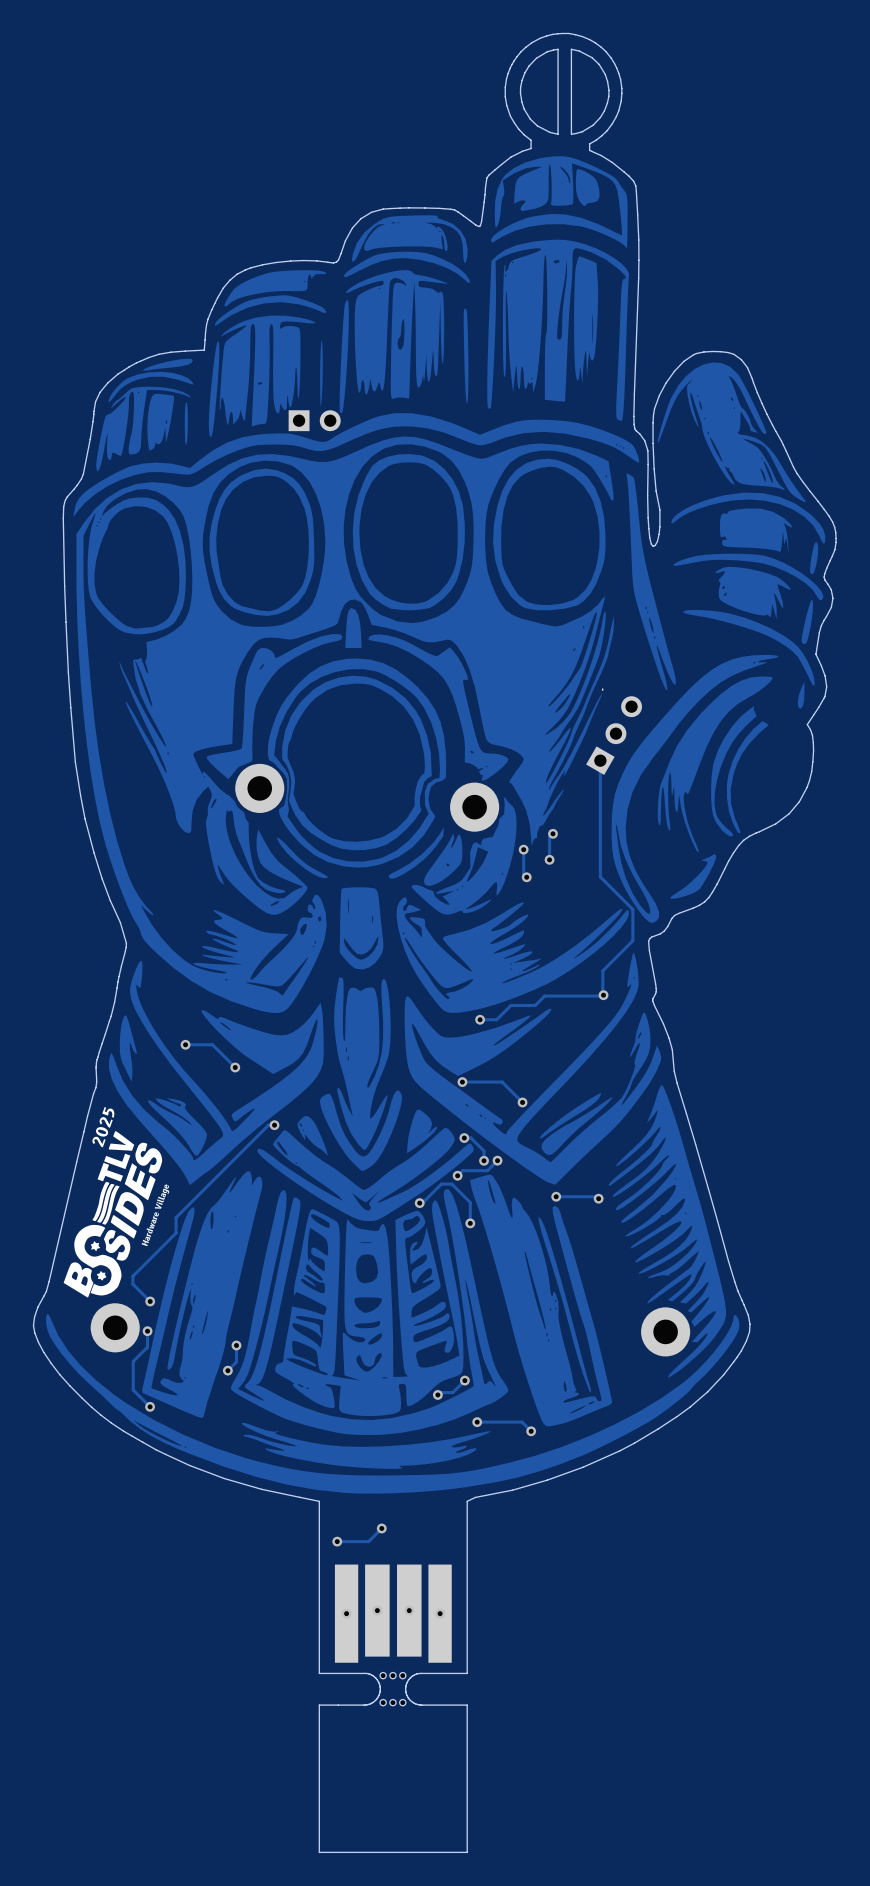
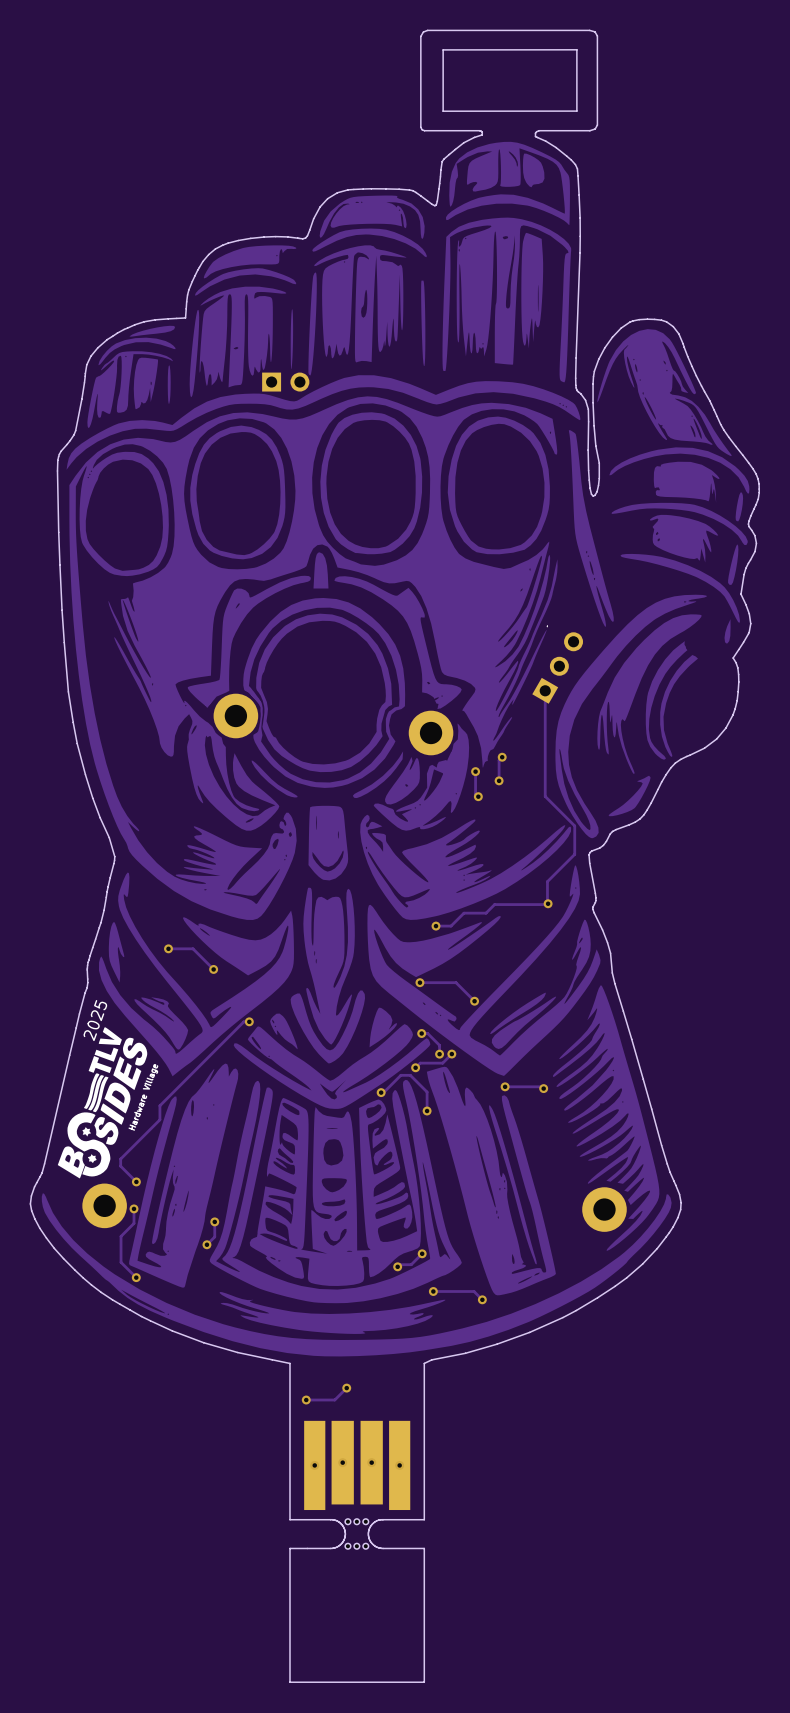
board edge: (562, 33) (539, 38) (525, 47) (514, 60) (506, 78) (505, 96) (510, 116) (518, 129) (531, 140) (531, 145) -> (510, 30) (427, 30) (423, 32) (420, 36) (422, 129) (482, 132)
board edge: (568, 33) (589, 39) (601, 47) (614, 63) (620, 79) (621, 100) (616, 116) (607, 130) (589, 143) (589, 146) -> (516, 30) (589, 30) (594, 31) (597, 35) (597, 125) (595, 129) (589, 130) (538, 130) (535, 133)
board edge: (558, 49) (547, 51) (536, 58) (529, 66) (522, 80) (520, 93) (524, 109) (530, 119) (537, 125) (558, 134) (558, 49) -> none
board edge: (571, 49) (592, 57) (599, 64) (605, 74) (608, 90) (607, 103) (600, 117) (593, 125) (582, 131) (571, 134) (571, 49) -> none
board edge: none -> (576, 49) (443, 49) (443, 111) (576, 111) (576, 49)

